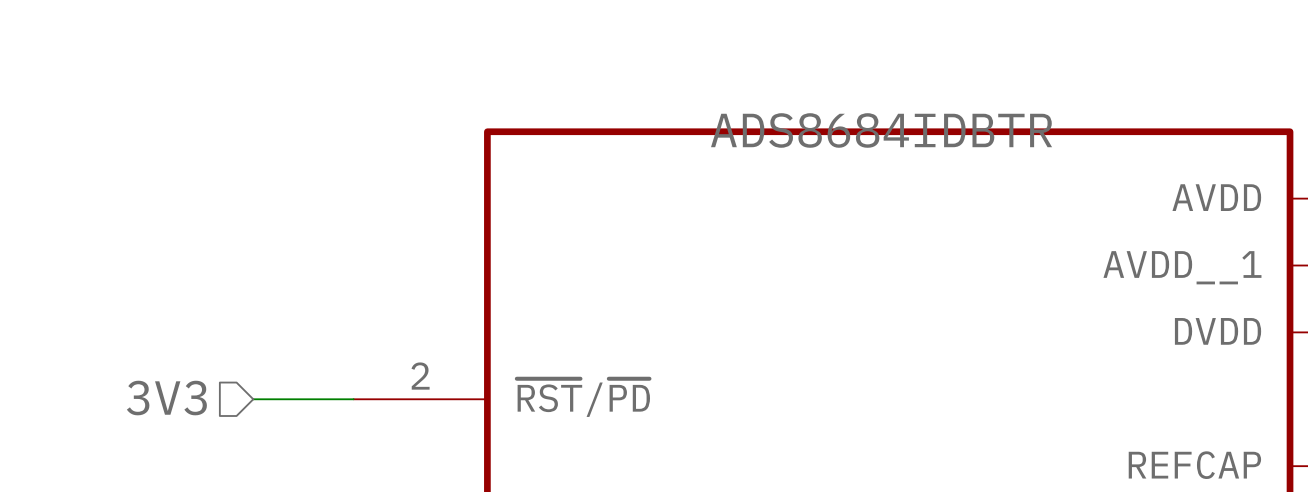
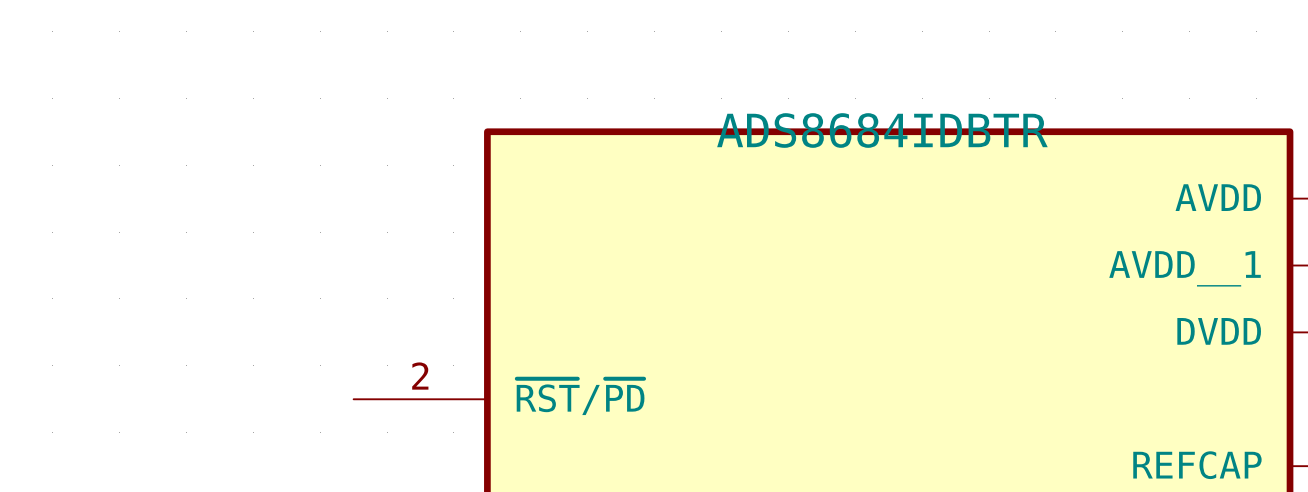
hierarchical label: 3V3 (166, 398) -> none
wire: (253, 399) (353, 399) -> none

